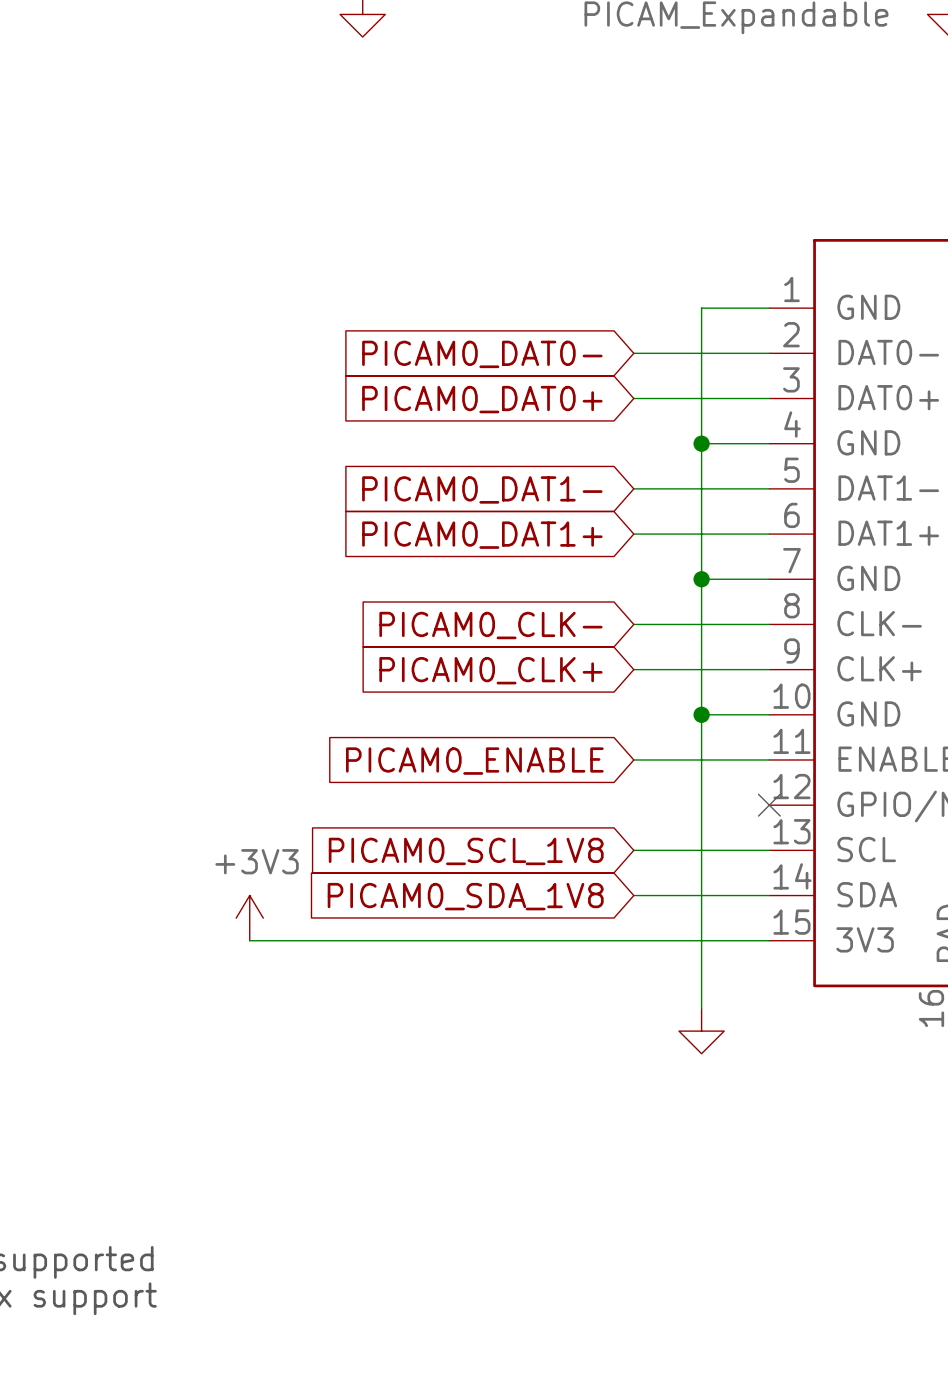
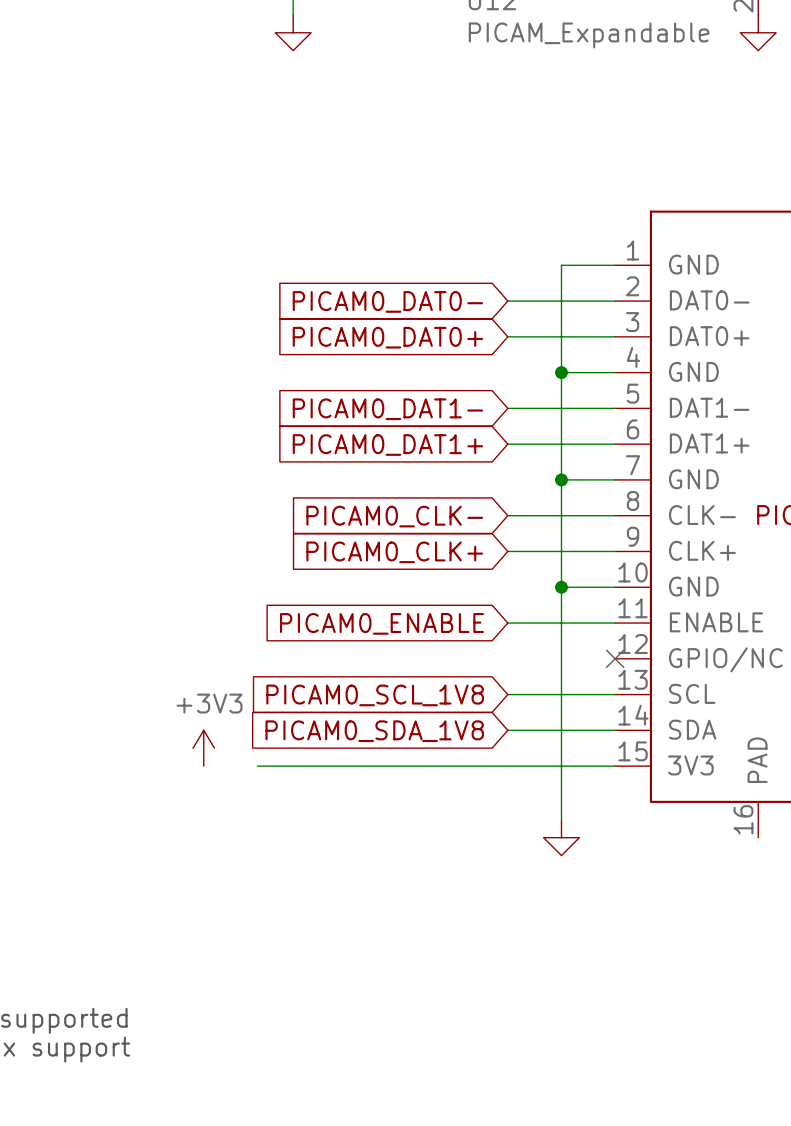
wire: (249, 940) (317, 940) -> none

